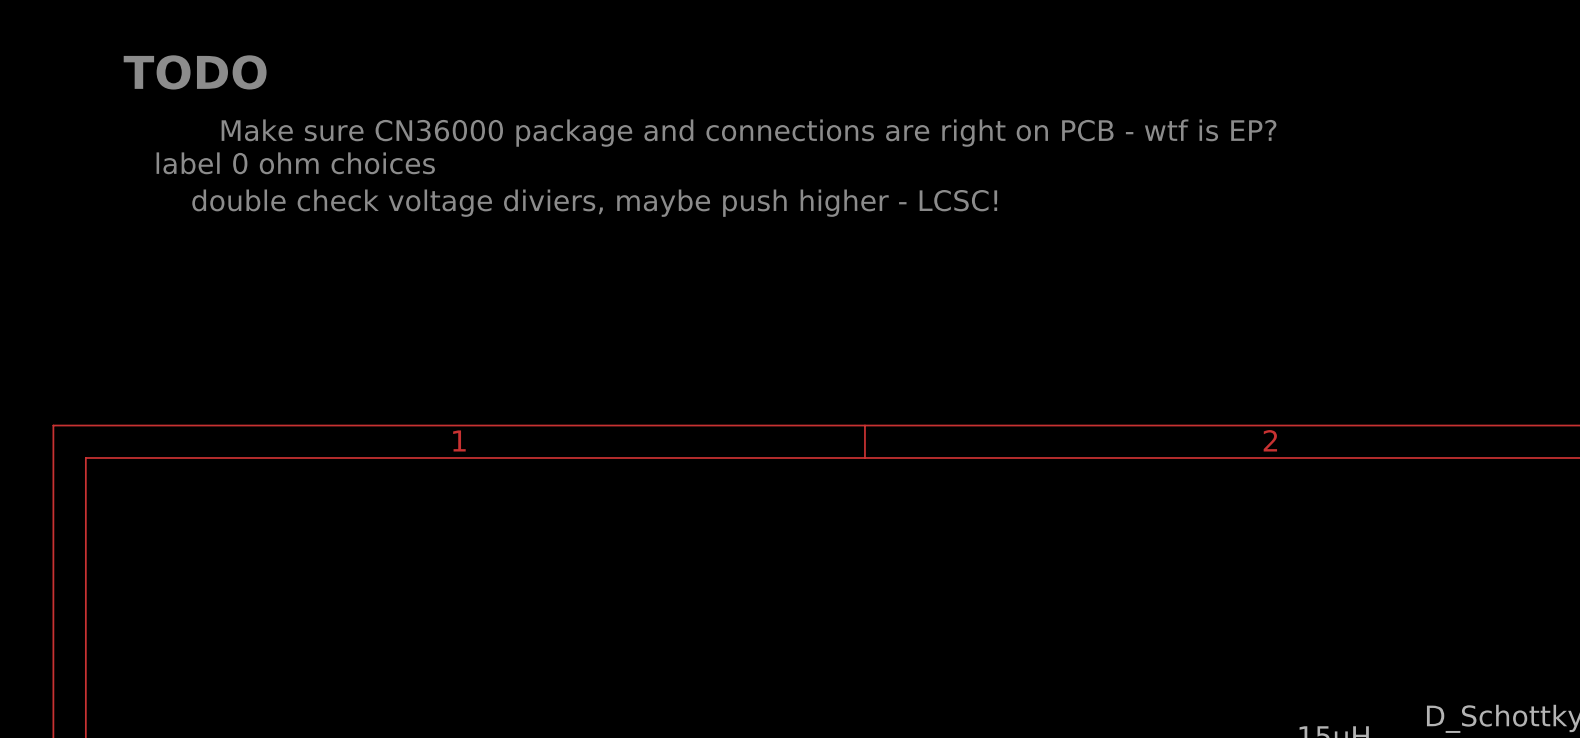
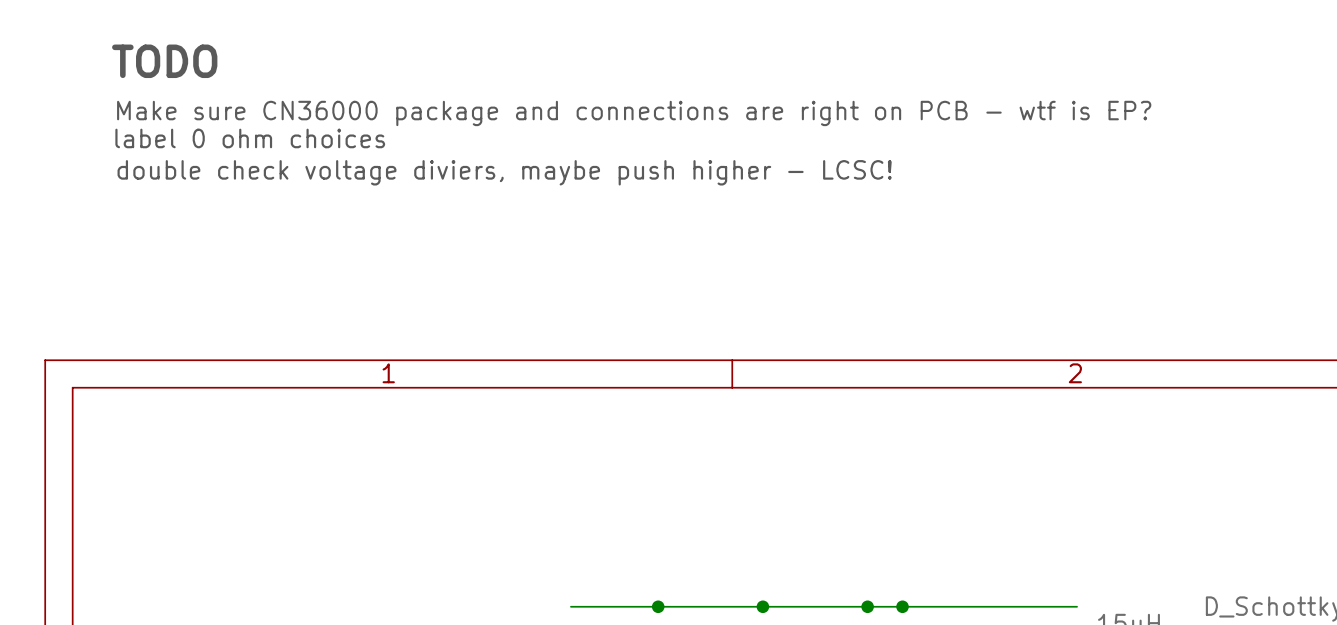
wire: none -> (570, 606) (1077, 606)
junction: none -> (658, 606)
junction: none -> (762, 606)
junction: none -> (867, 606)
junction: none -> (902, 606)

